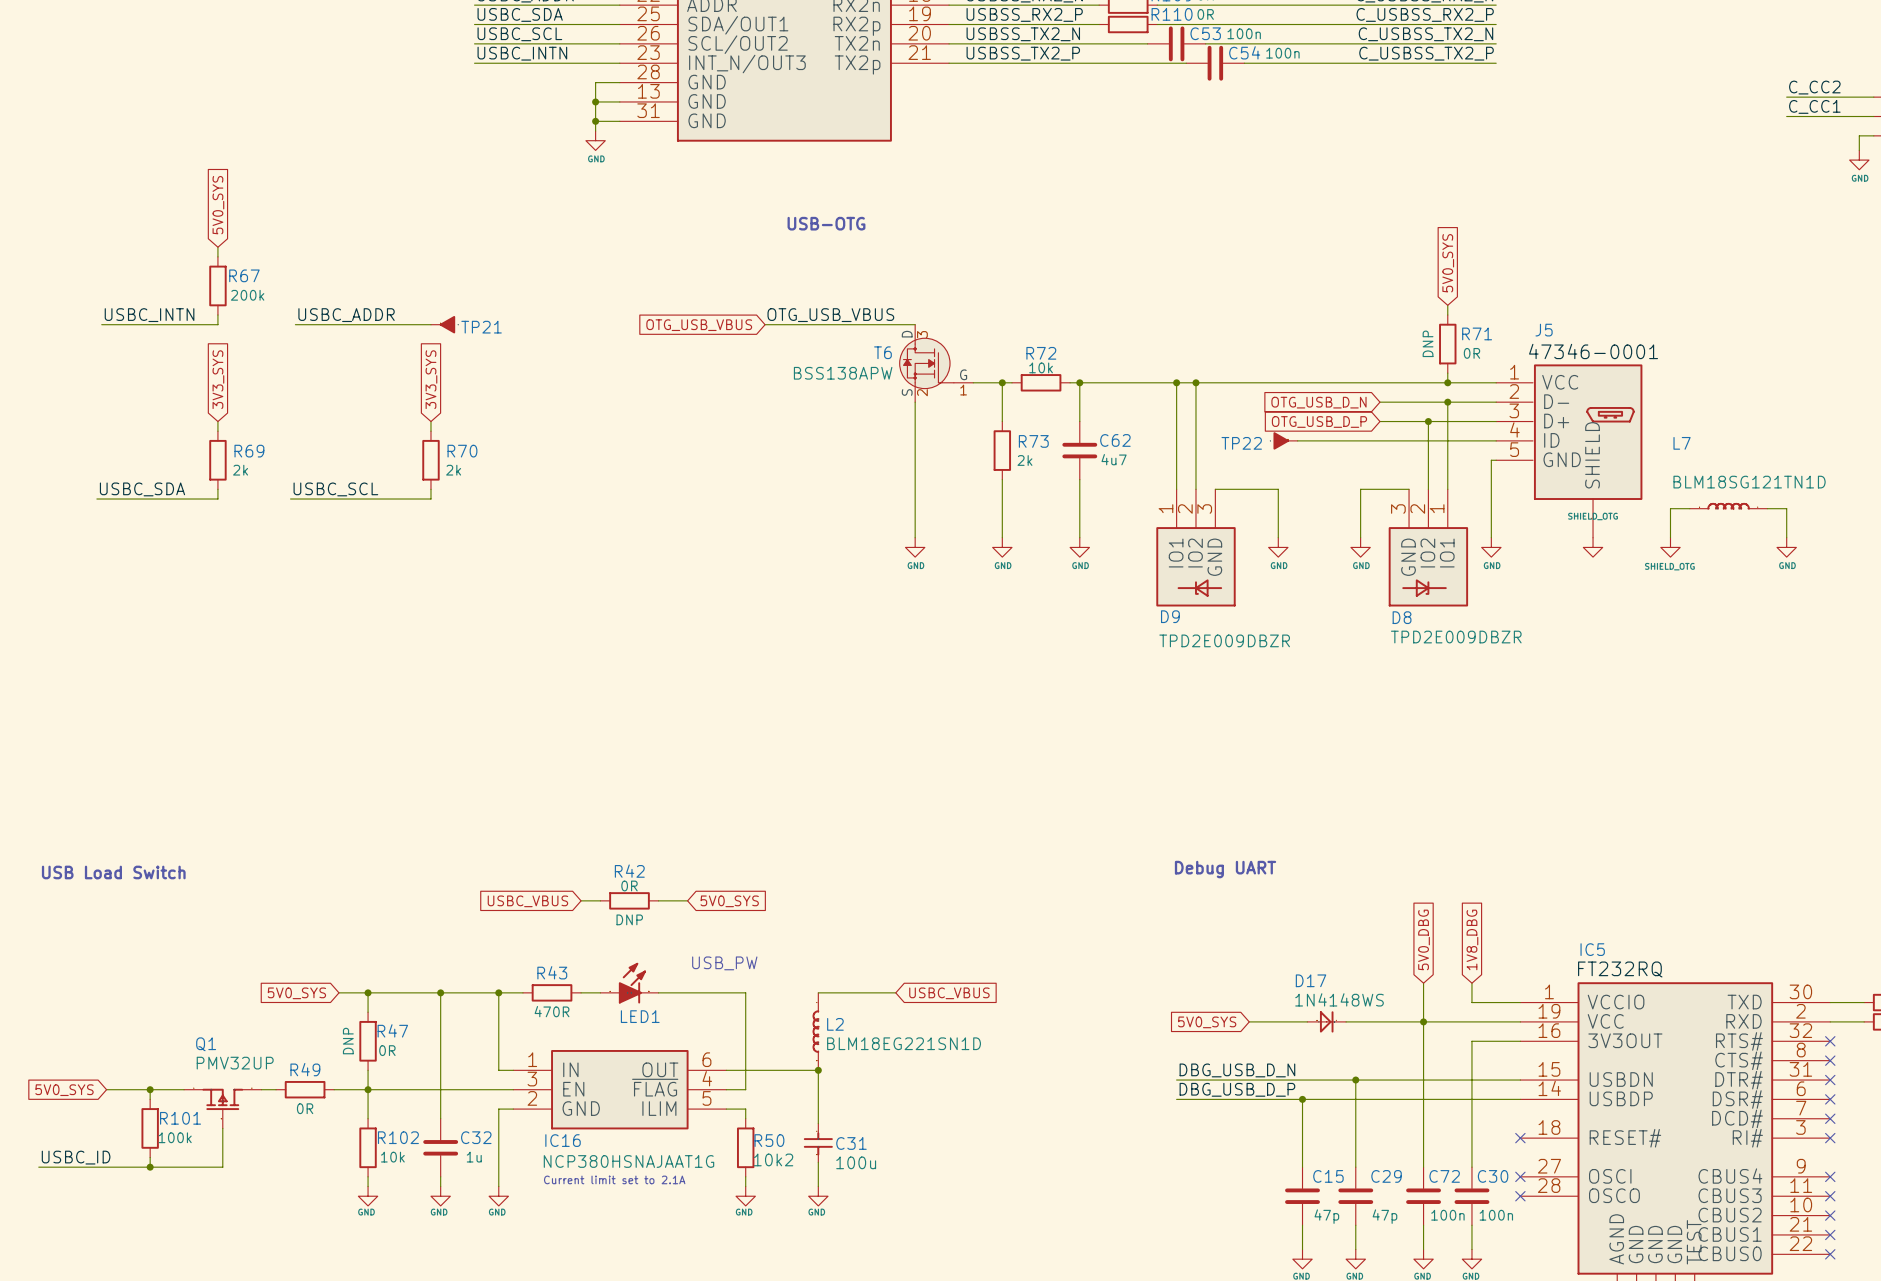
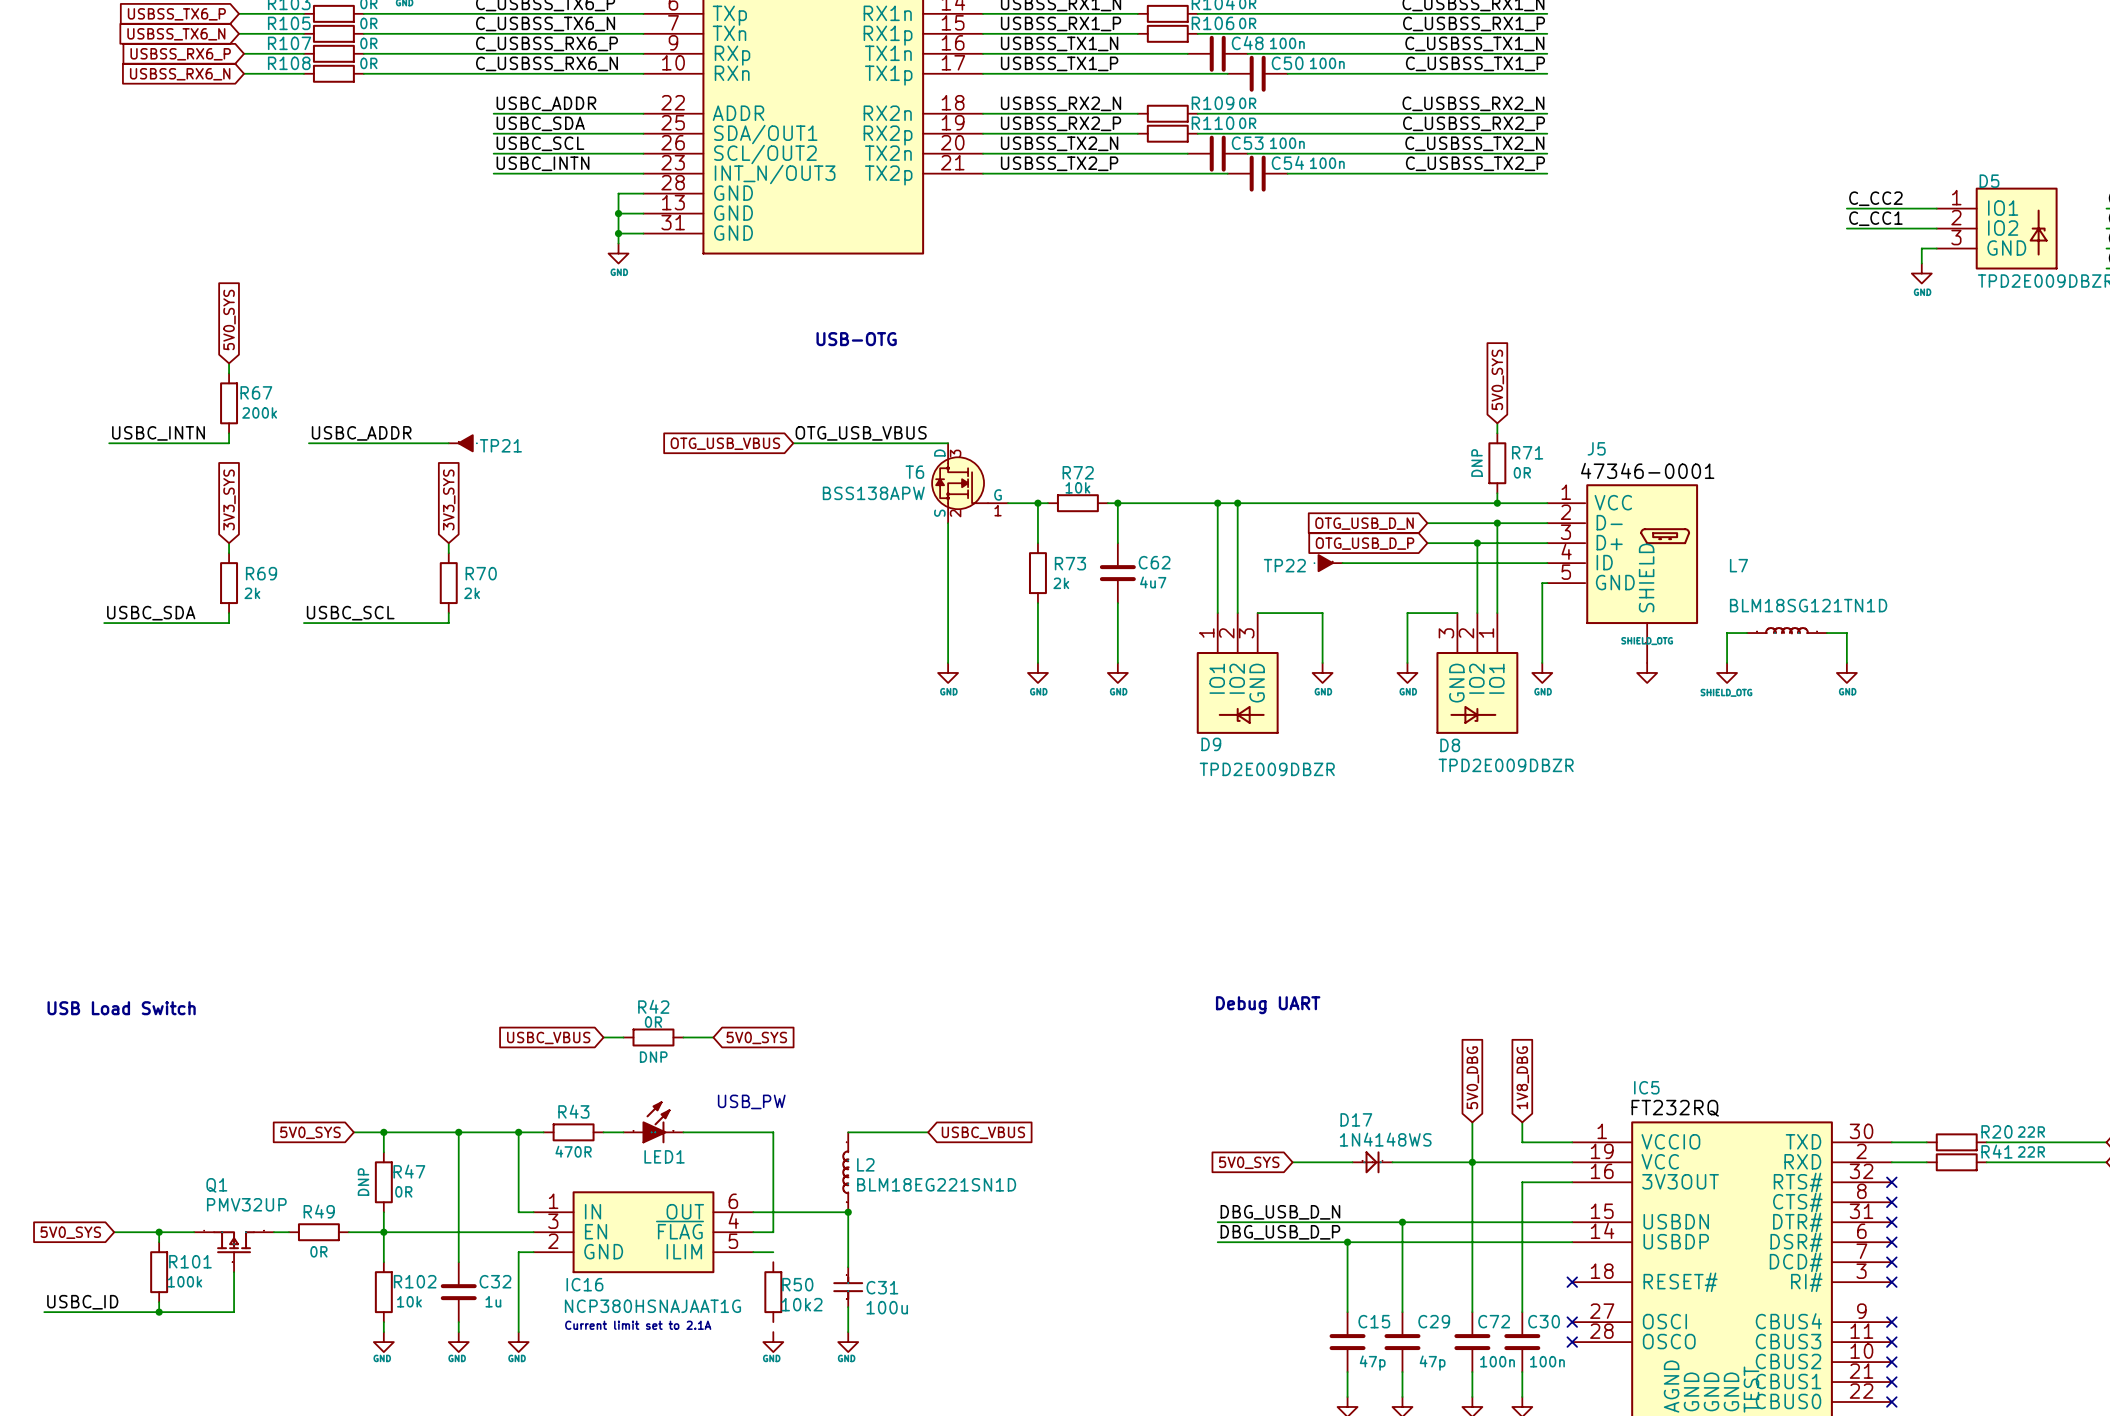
wire: (745, 1109) (745, 1118) -> none
wire: (745, 1176) (745, 1186) -> none

